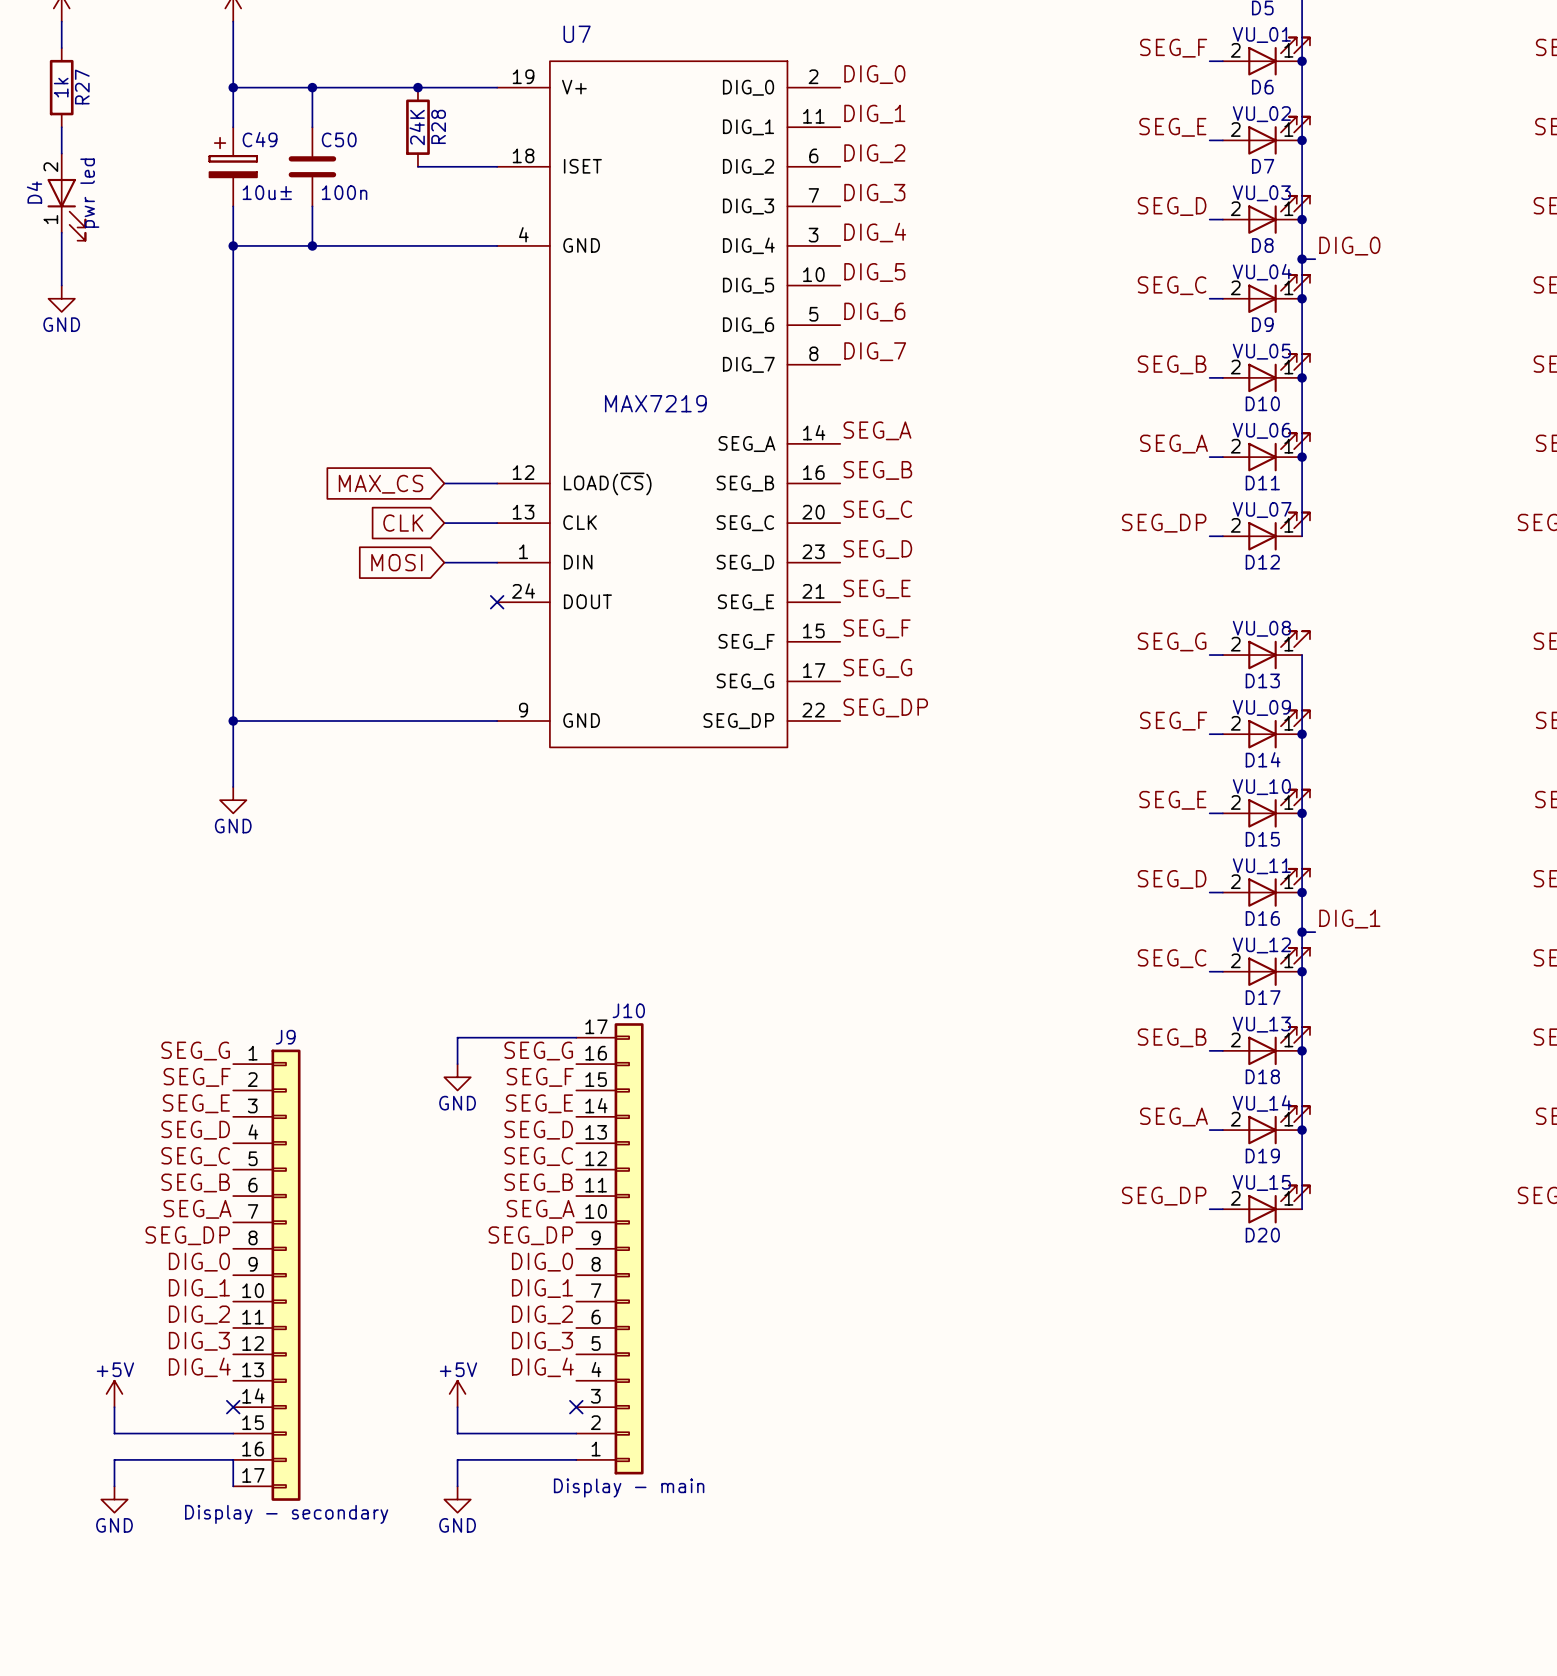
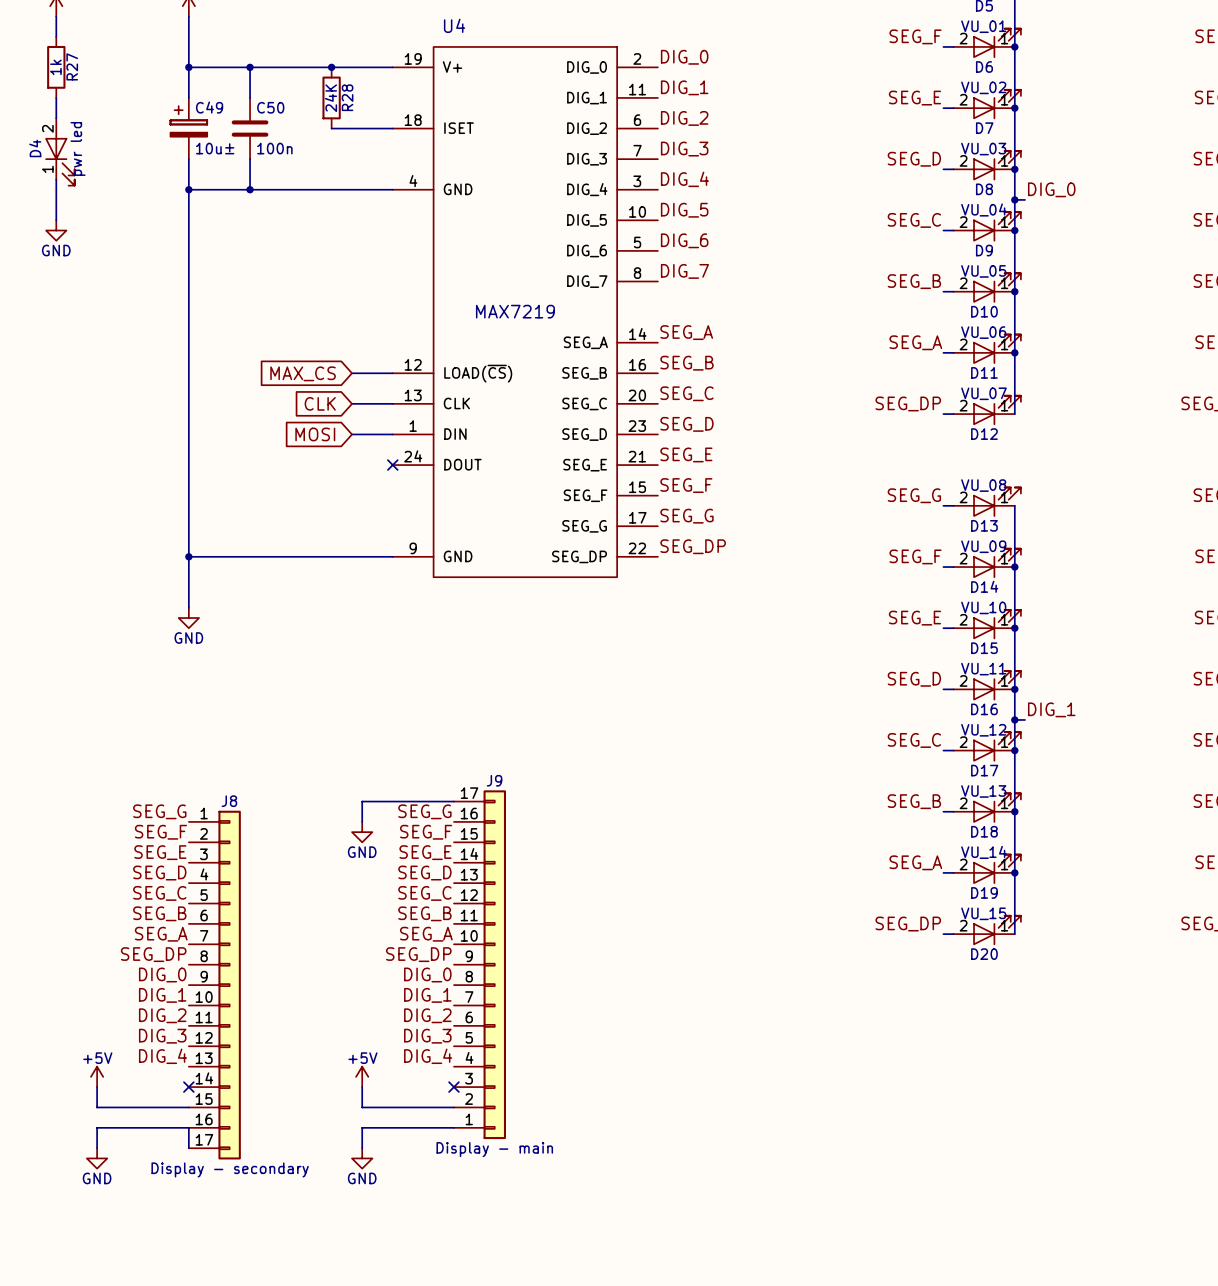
U7 name: U7 (577, 34) -> U4 (454, 25)
J10 name: J10 (628, 1010) -> J9 (494, 780)
J9 name: J9 (285, 1037) -> J8 (229, 801)

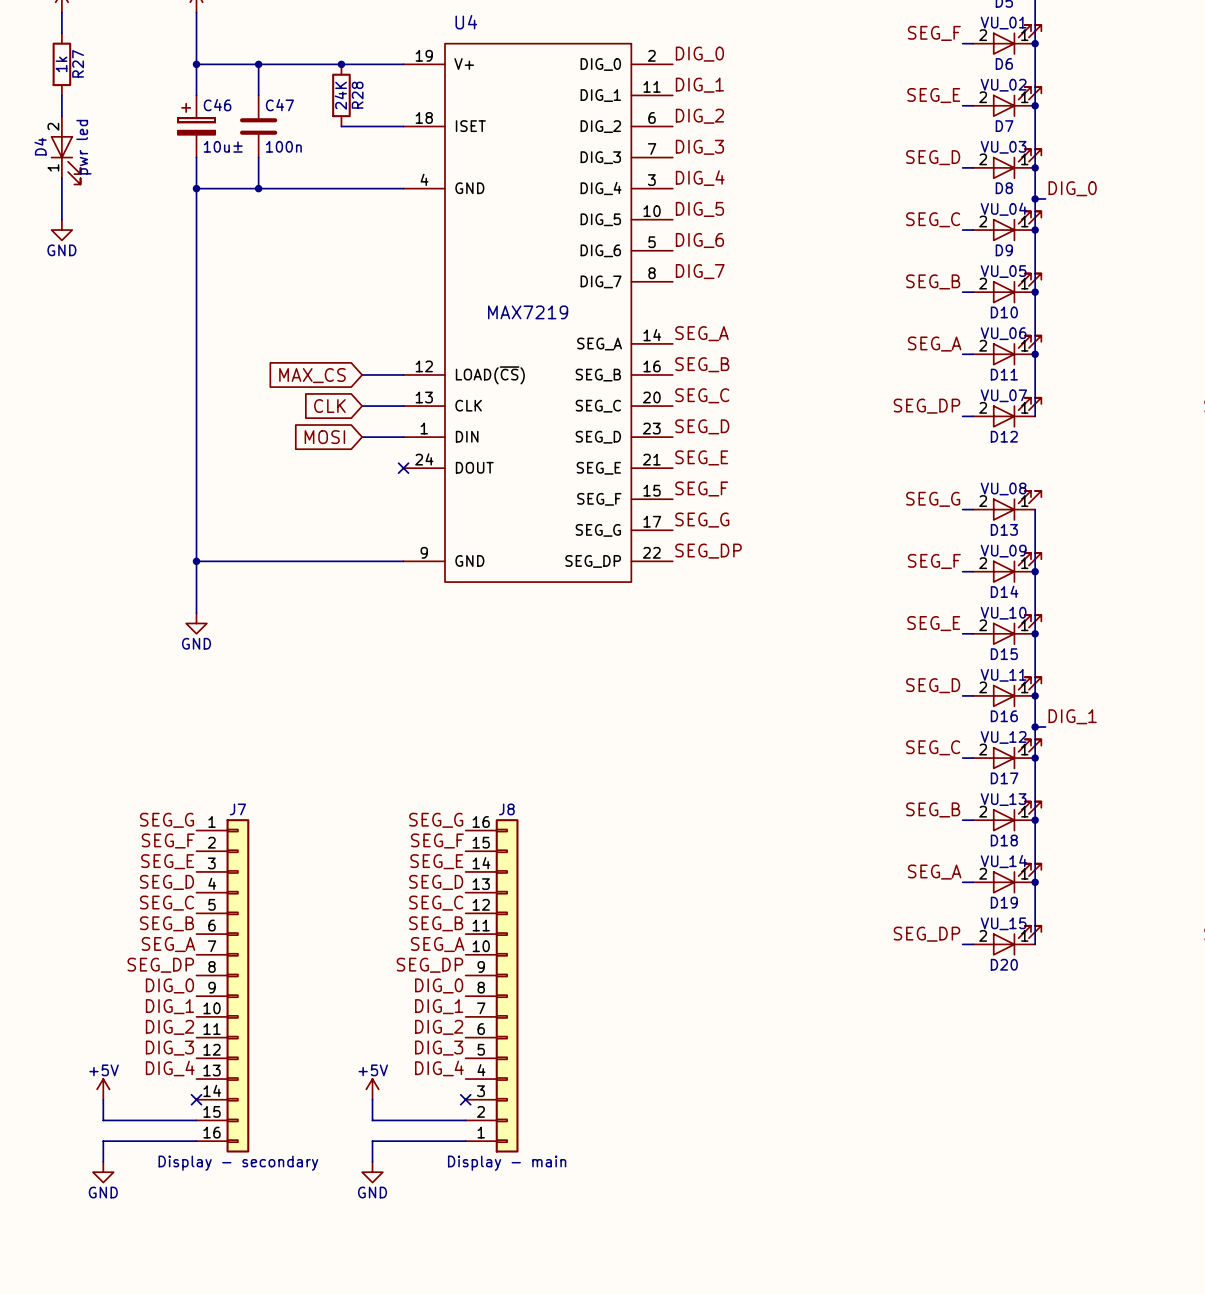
C49 name: C49 (209, 107) -> C46 (217, 105)
C50 name: C50 (270, 107) -> C47 (279, 105)
wire: (453, 801) (362, 801) (362, 821) -> none
J8 symbol: [188, 810, 241, 1160] -> [465, 819, 519, 1153]
power symbol: GND (362, 832) -> none
J9: Display - main (479, 964) -> none
J7: none -> Display - secondary (222, 985)
wire: (188, 1127) (188, 1148) -> none
J8 value: Display - secondary (230, 1169) -> Display - main (507, 1163)

